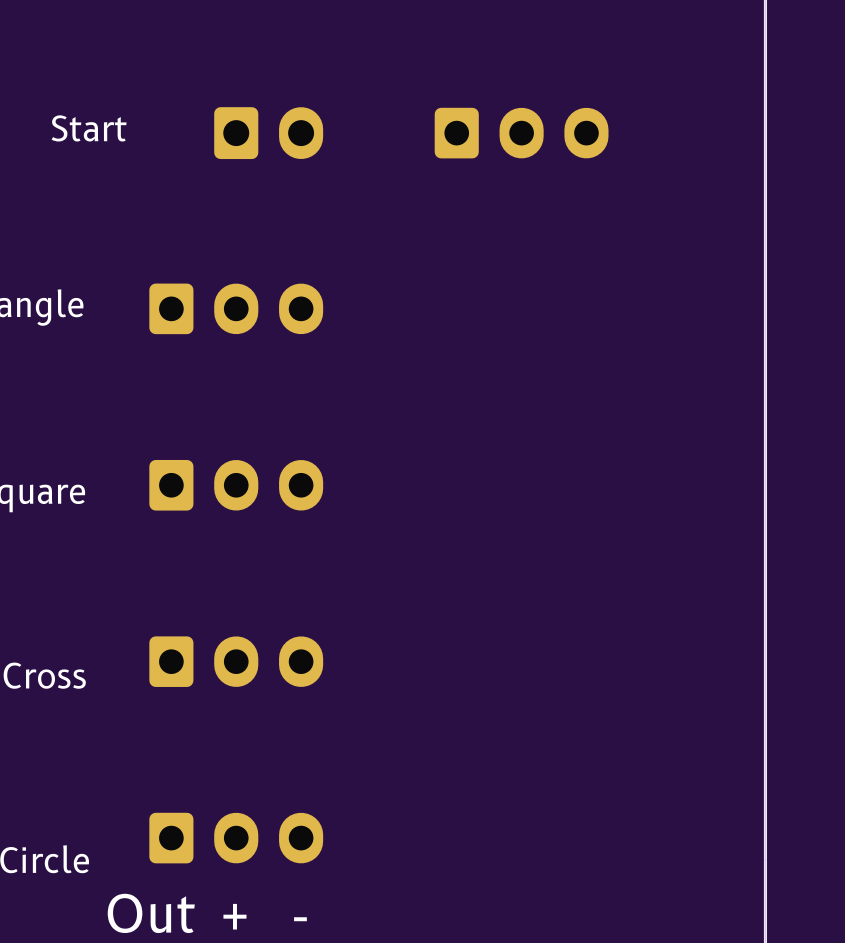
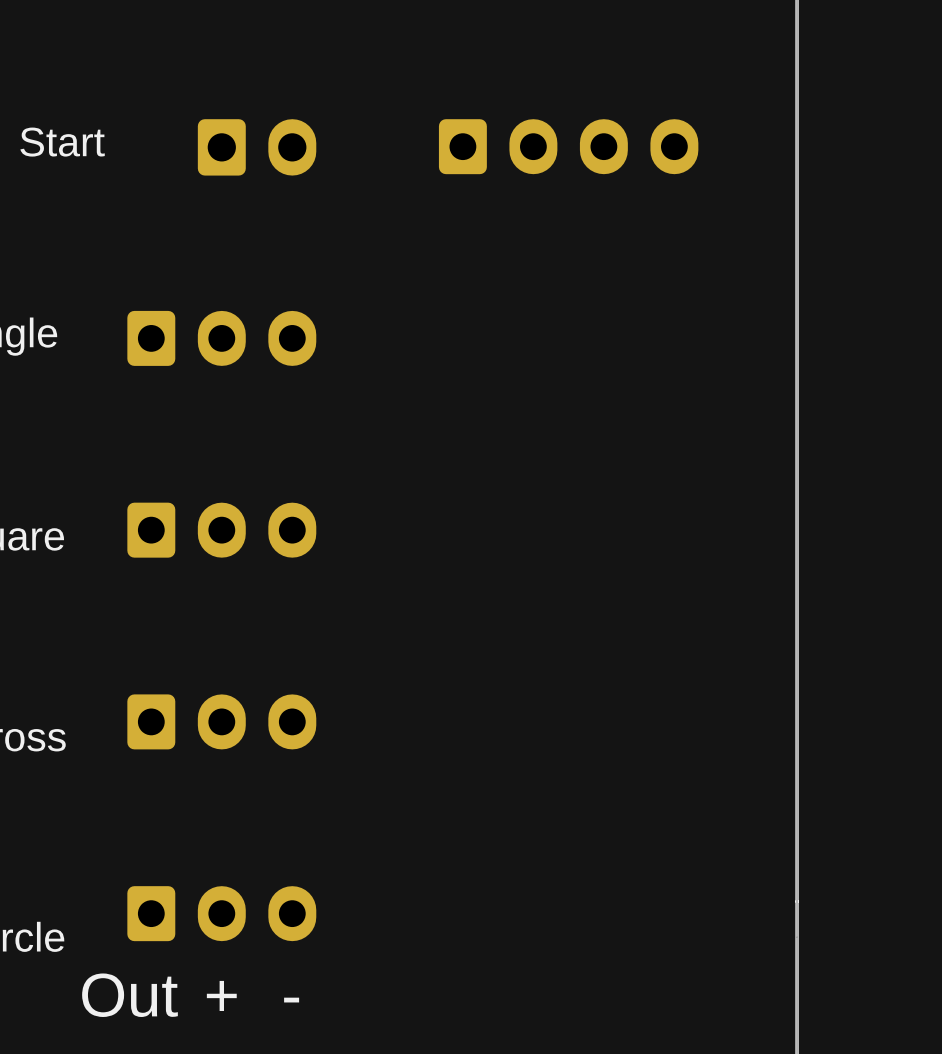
part: none -> (568, 146)
part: (521, 133) -> none

